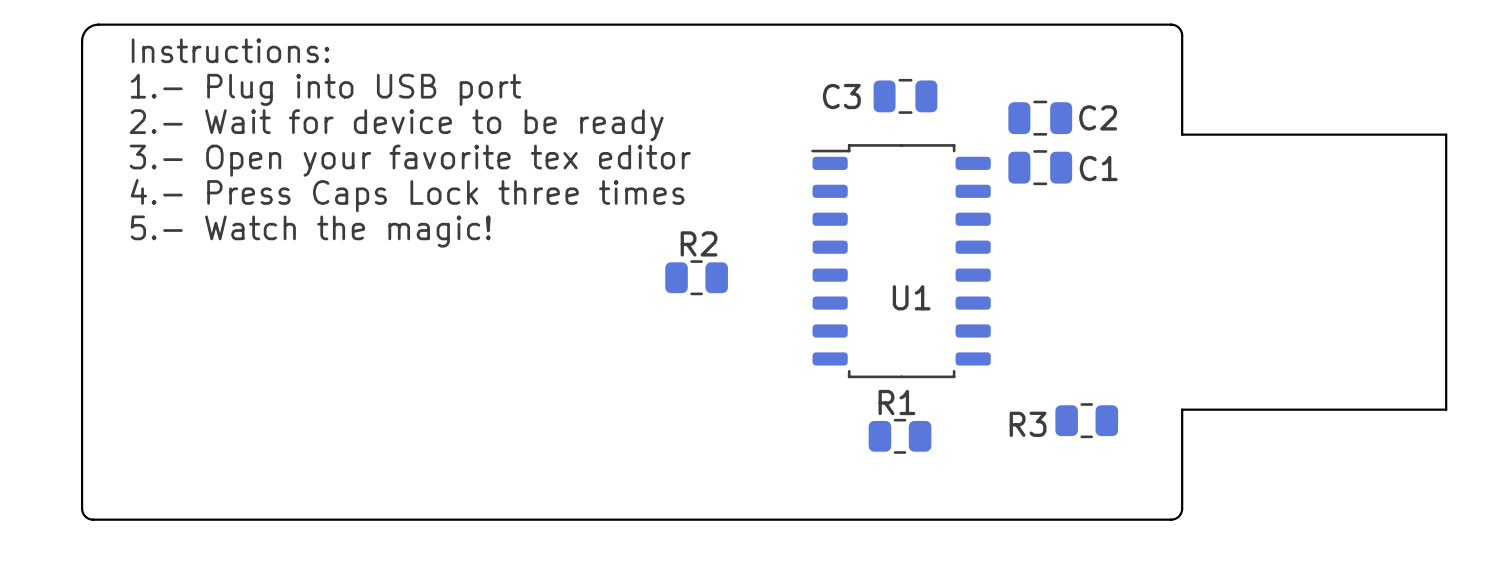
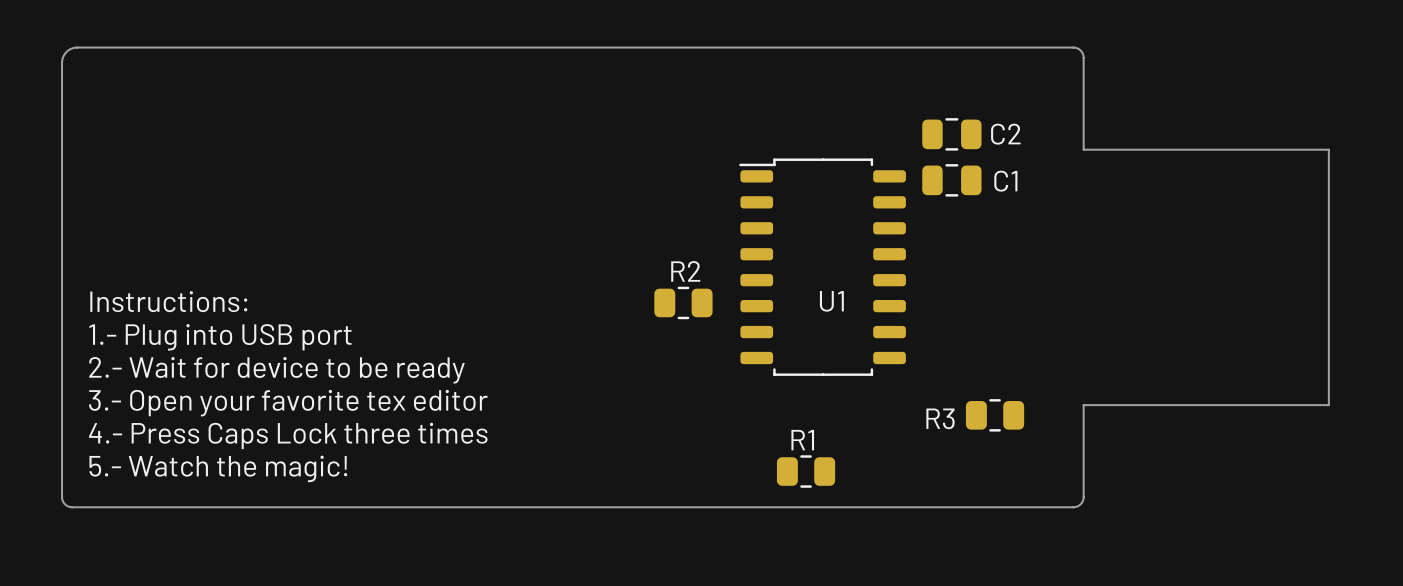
text position: Instructions: (230, 50) -> Instructions: (168, 301)
text position: 1.- Plug into USB port (325, 89) -> 1.- Plug into USB port (220, 337)
C3: (905, 96) -> none
text position: 2.- Wait for device to be ready (396, 125) -> 2.- Wait for device to be ready (277, 370)
text position: 3.- Open your favorite tex editor (410, 160) -> 3.- Open your favorite tex editor (288, 403)
text position: 4.- Press Caps Lock three times (407, 195) -> 4.- Press Caps Lock three times (288, 435)
text position: 5.- Watch the magic! (310, 231) -> 5.- Watch the magic! (218, 468)
R2 position: (696, 277) -> (683, 302)
R1 position: (899, 436) -> (806, 471)

